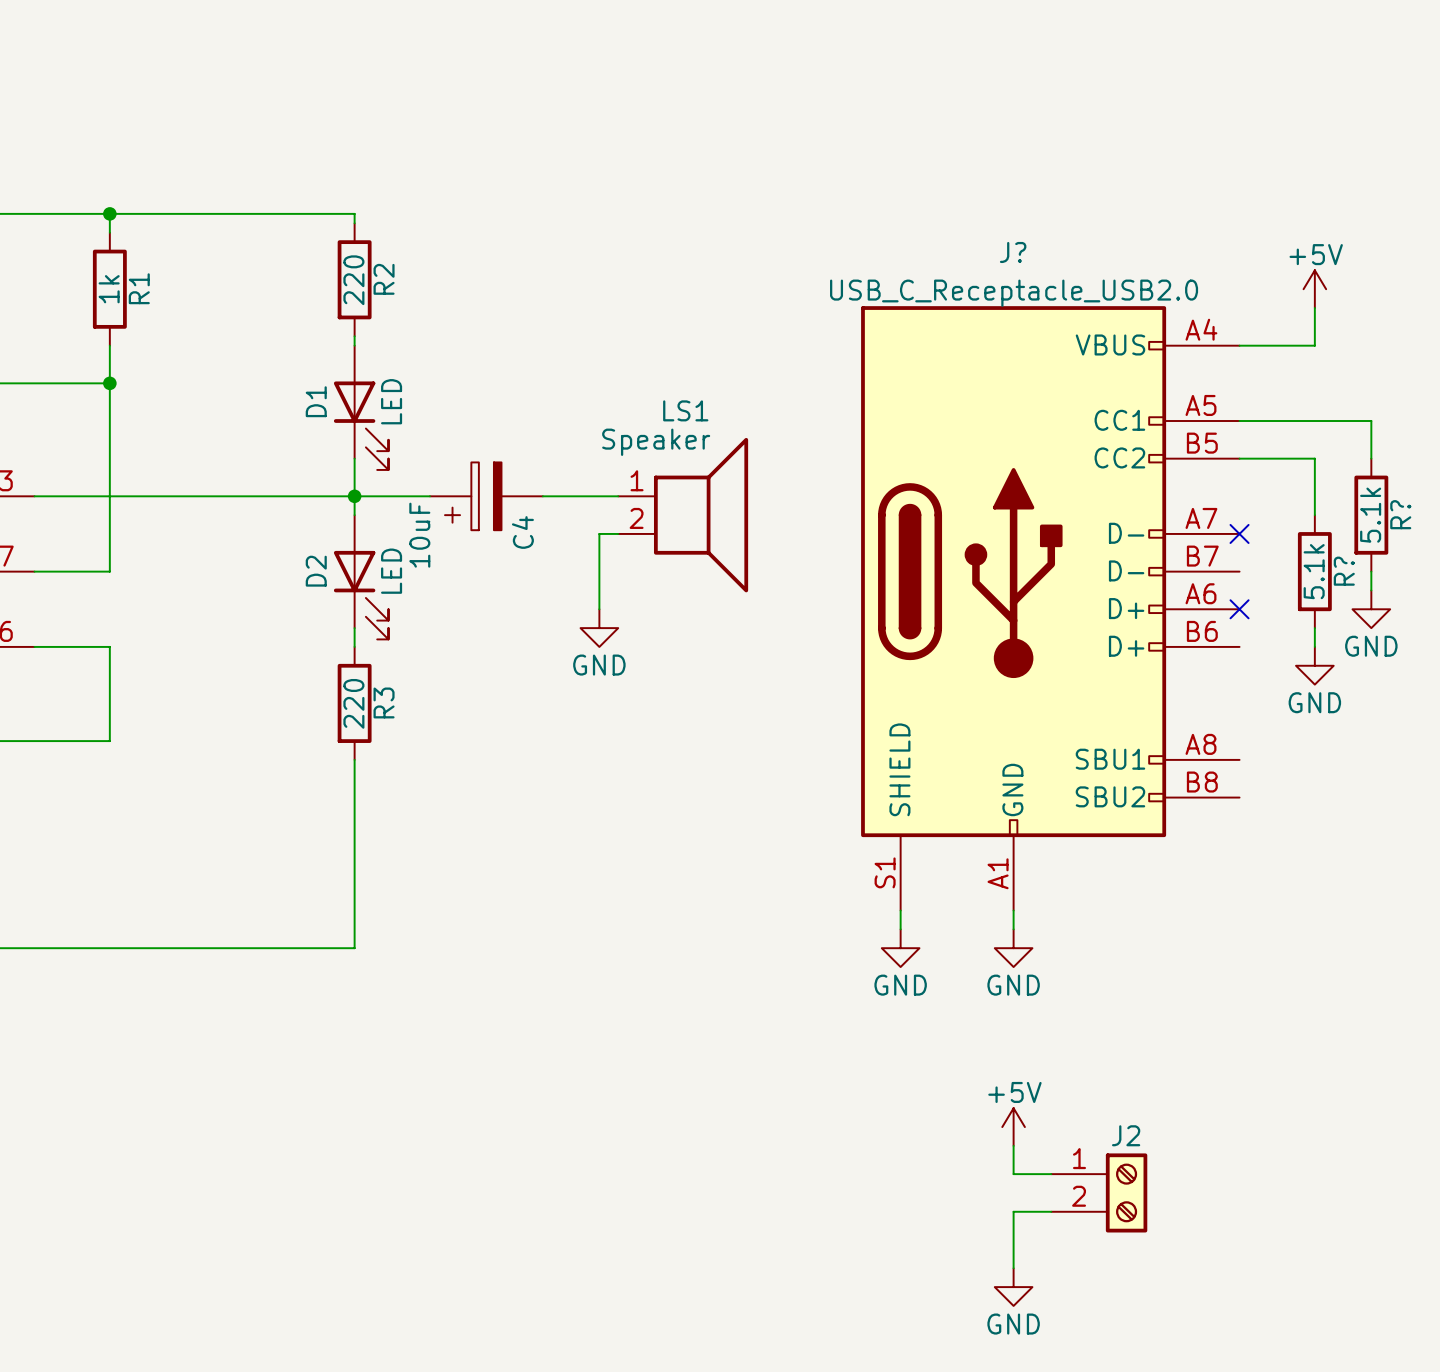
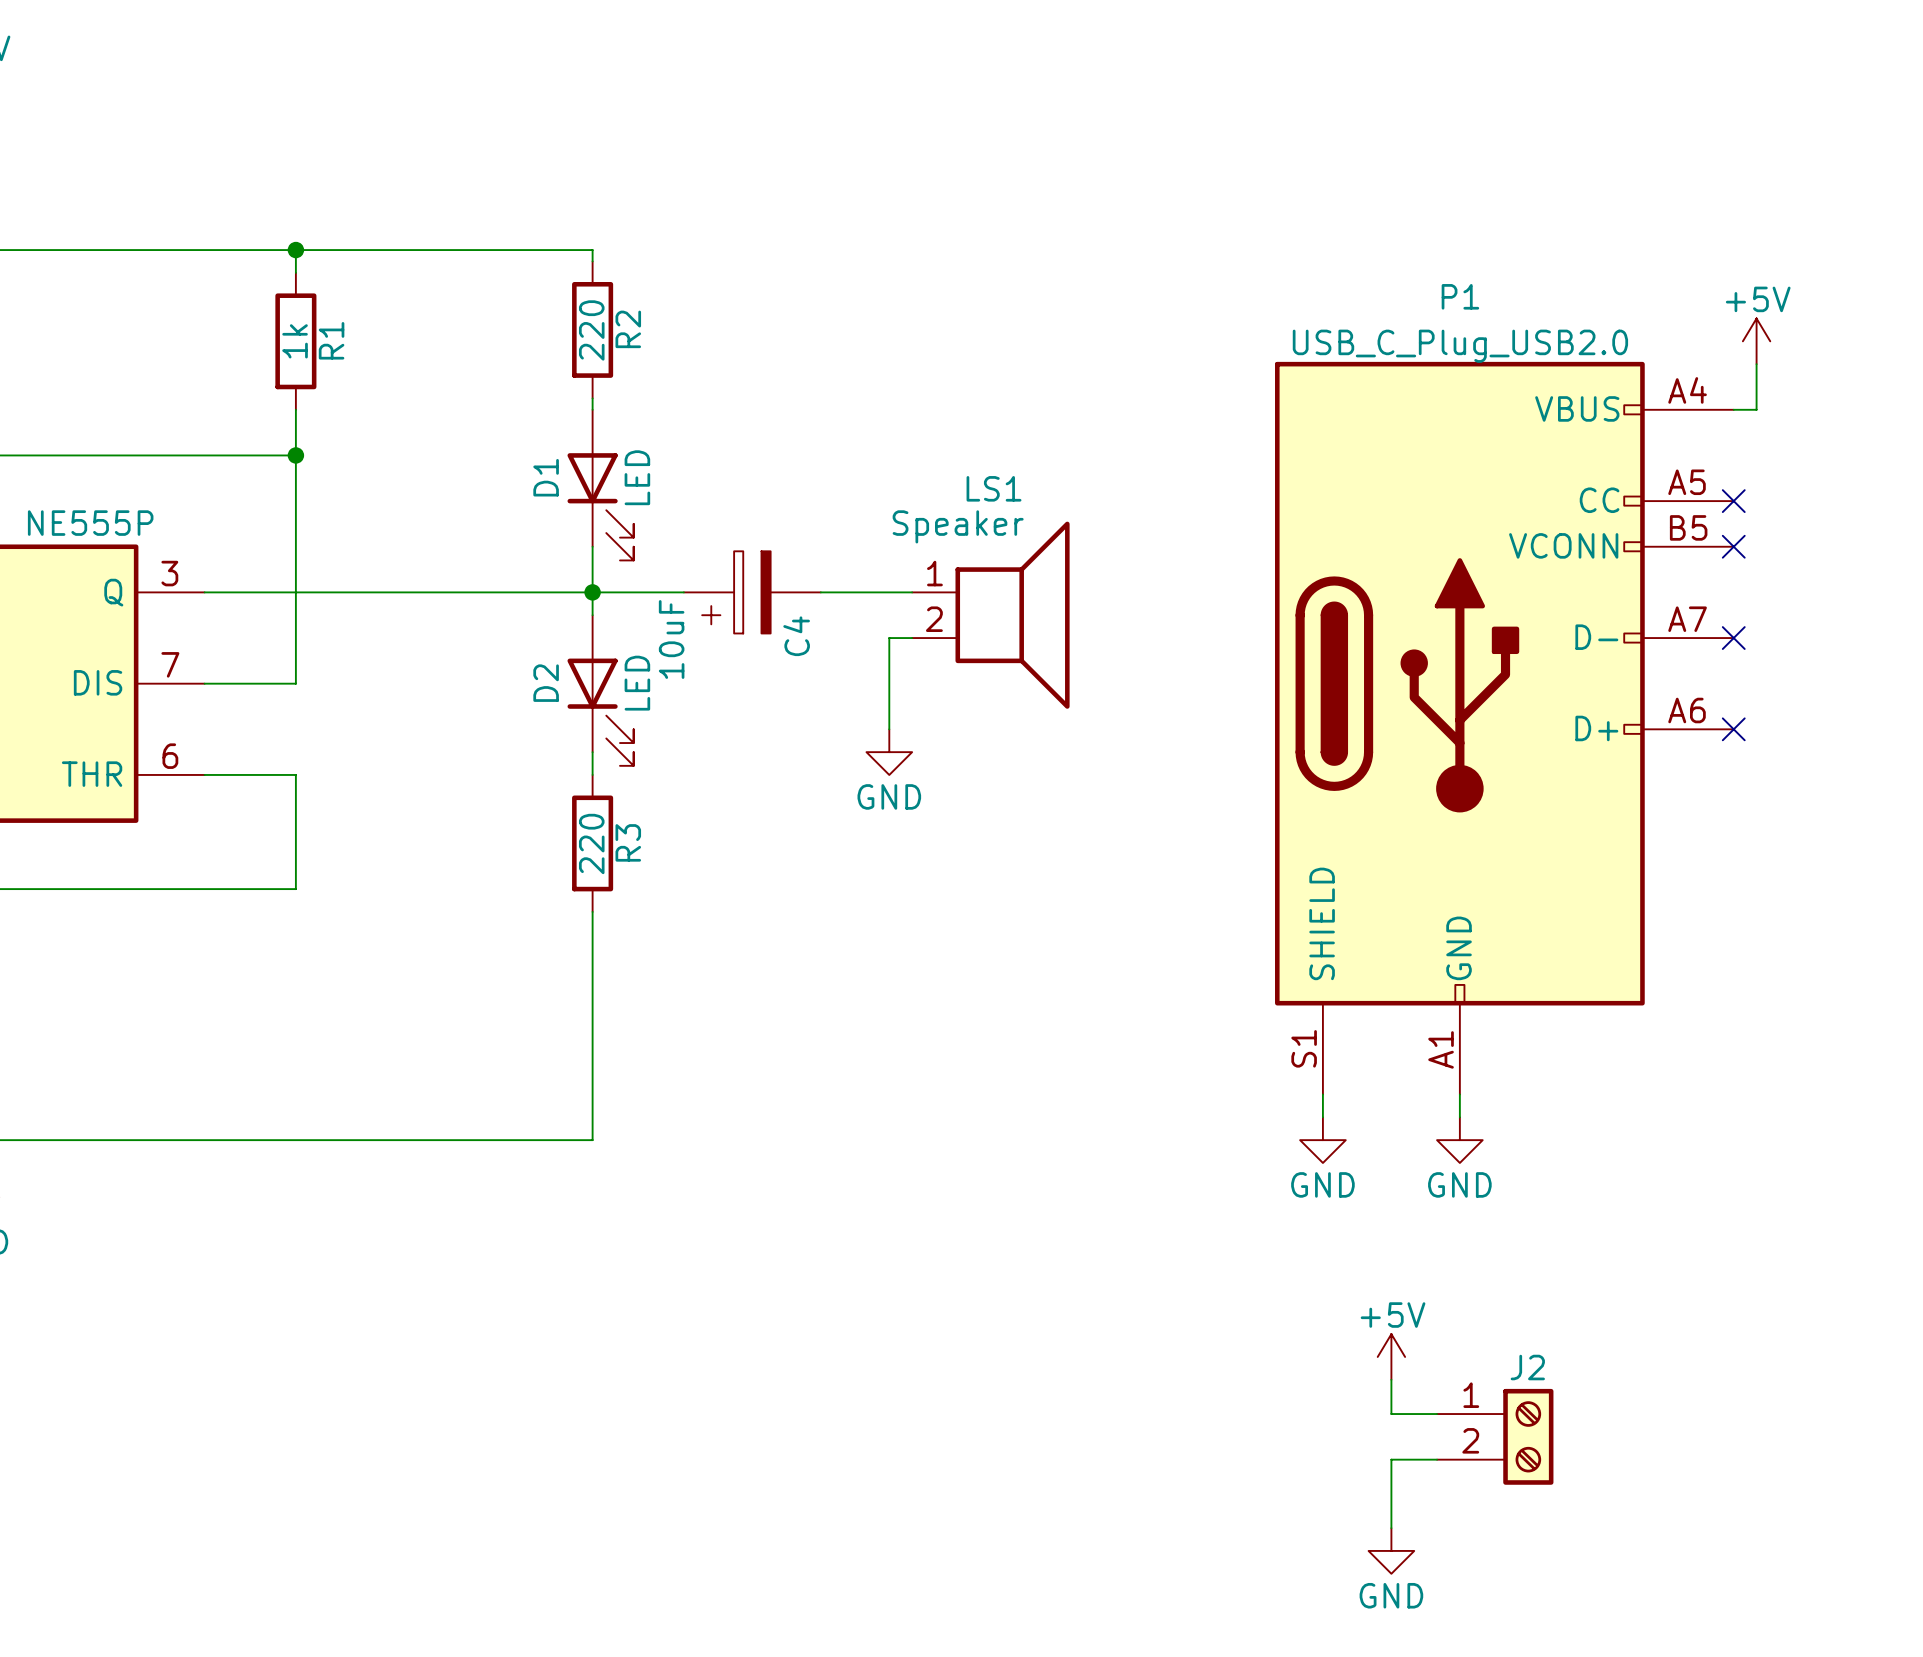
wire: (1239, 421) (1371, 421) (1371, 458) -> none
no-connect mark: none -> (1733, 501)
wire: (1239, 458) (1314, 458) (1314, 515) -> none
no-connect mark: none -> (1733, 546)
R?: 5.1k (1371, 515) -> none
no-connect mark: (1239, 533) -> none
no-connect mark: none -> (1733, 638)
R?: 5.1k (1314, 571) -> none
wire: (1371, 571) (1371, 590) -> none
J?: USB_C_Receptacle_USB2.0 (1050, 608) -> none
P1: none -> USB_C_Plug_USB2.0 (1504, 728)
no-connect mark: (1239, 609) -> none
no-connect mark: none -> (1733, 729)
power symbol: GND (1371, 609) -> none
wire: (1314, 628) (1314, 646) -> none
power symbol: GND (1314, 665) -> none
wire: (900, 910) (900, 929) -> (1322, 1094) (1322, 1117)
wire: (1013, 910) (1013, 929) -> (1459, 1094) (1459, 1117)
power symbol: GND (900, 948) -> none
power symbol: none -> GND (1322, 1140)
power symbol: GND (1013, 948) -> none
power symbol: none -> GND (1459, 1140)

